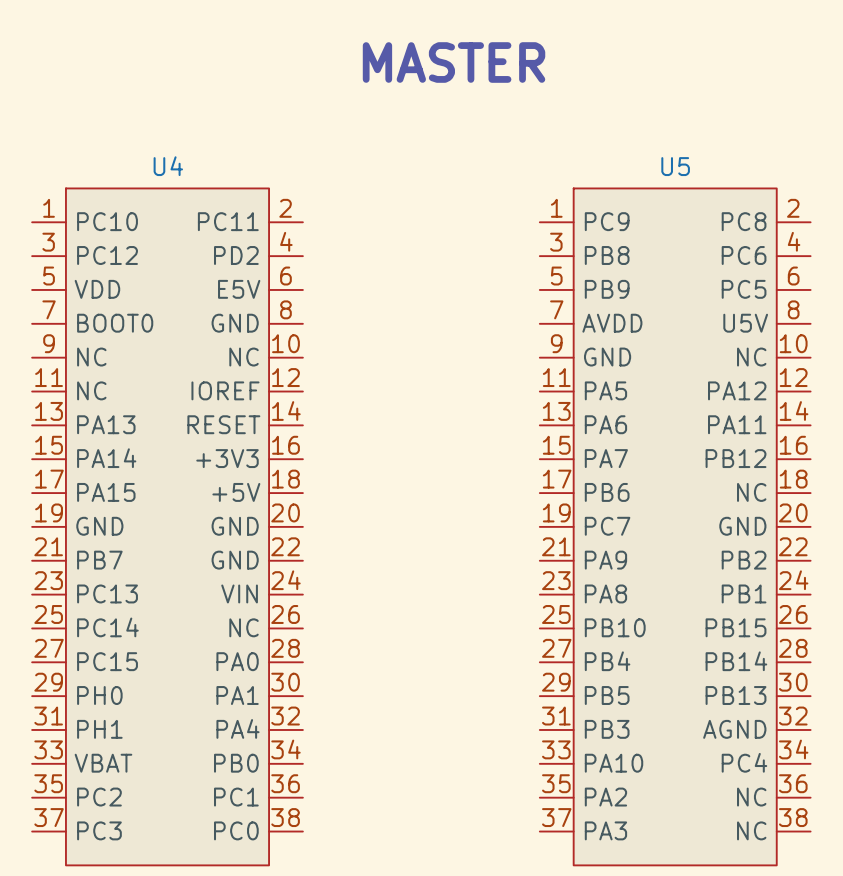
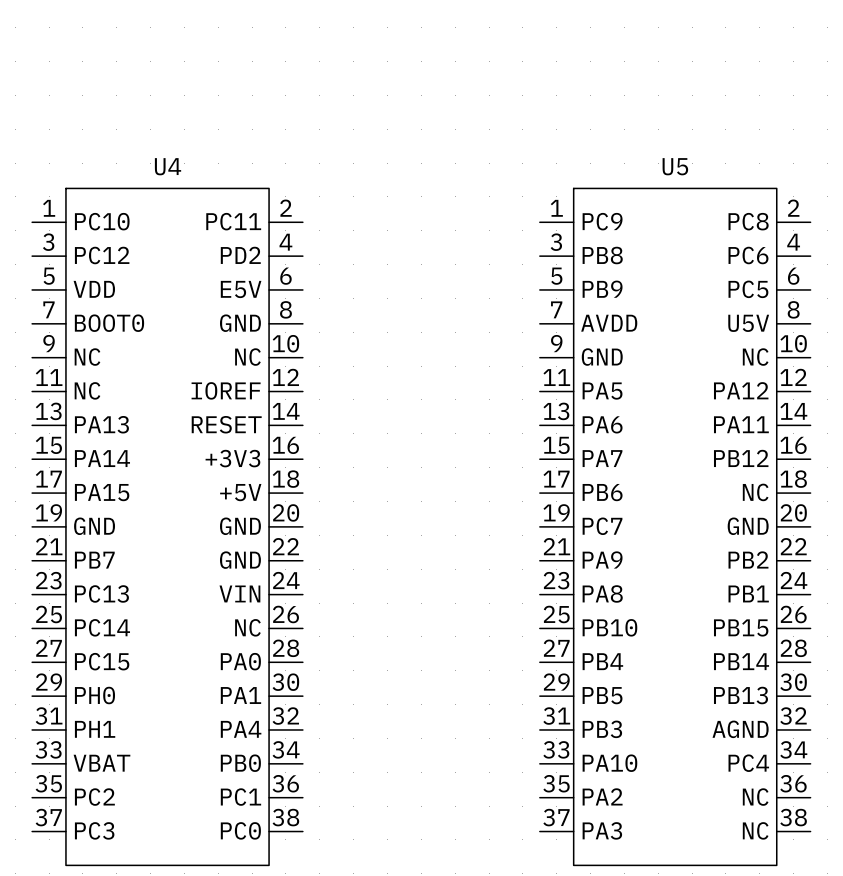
text: MASTER (454, 62) -> none

